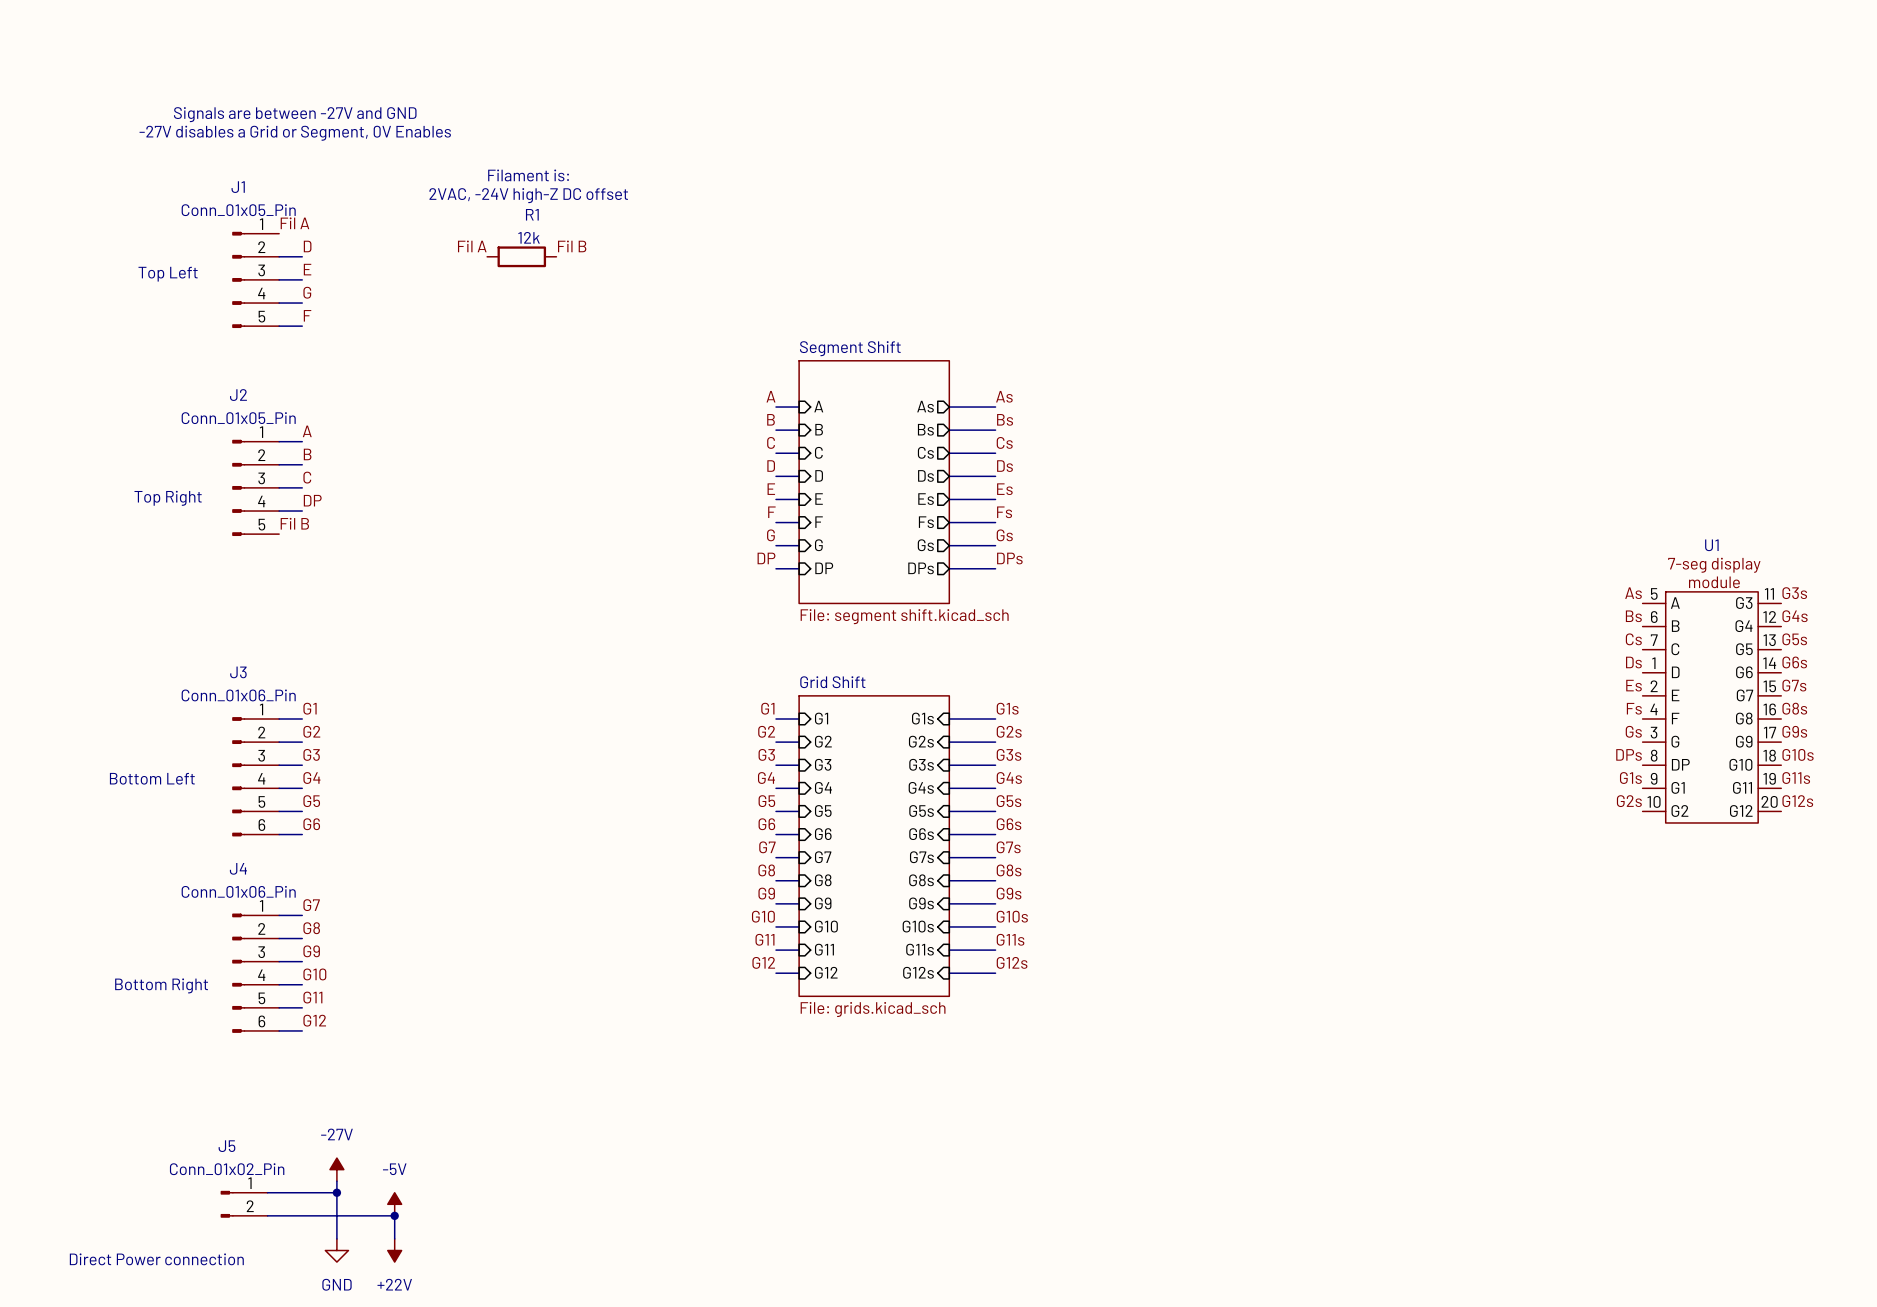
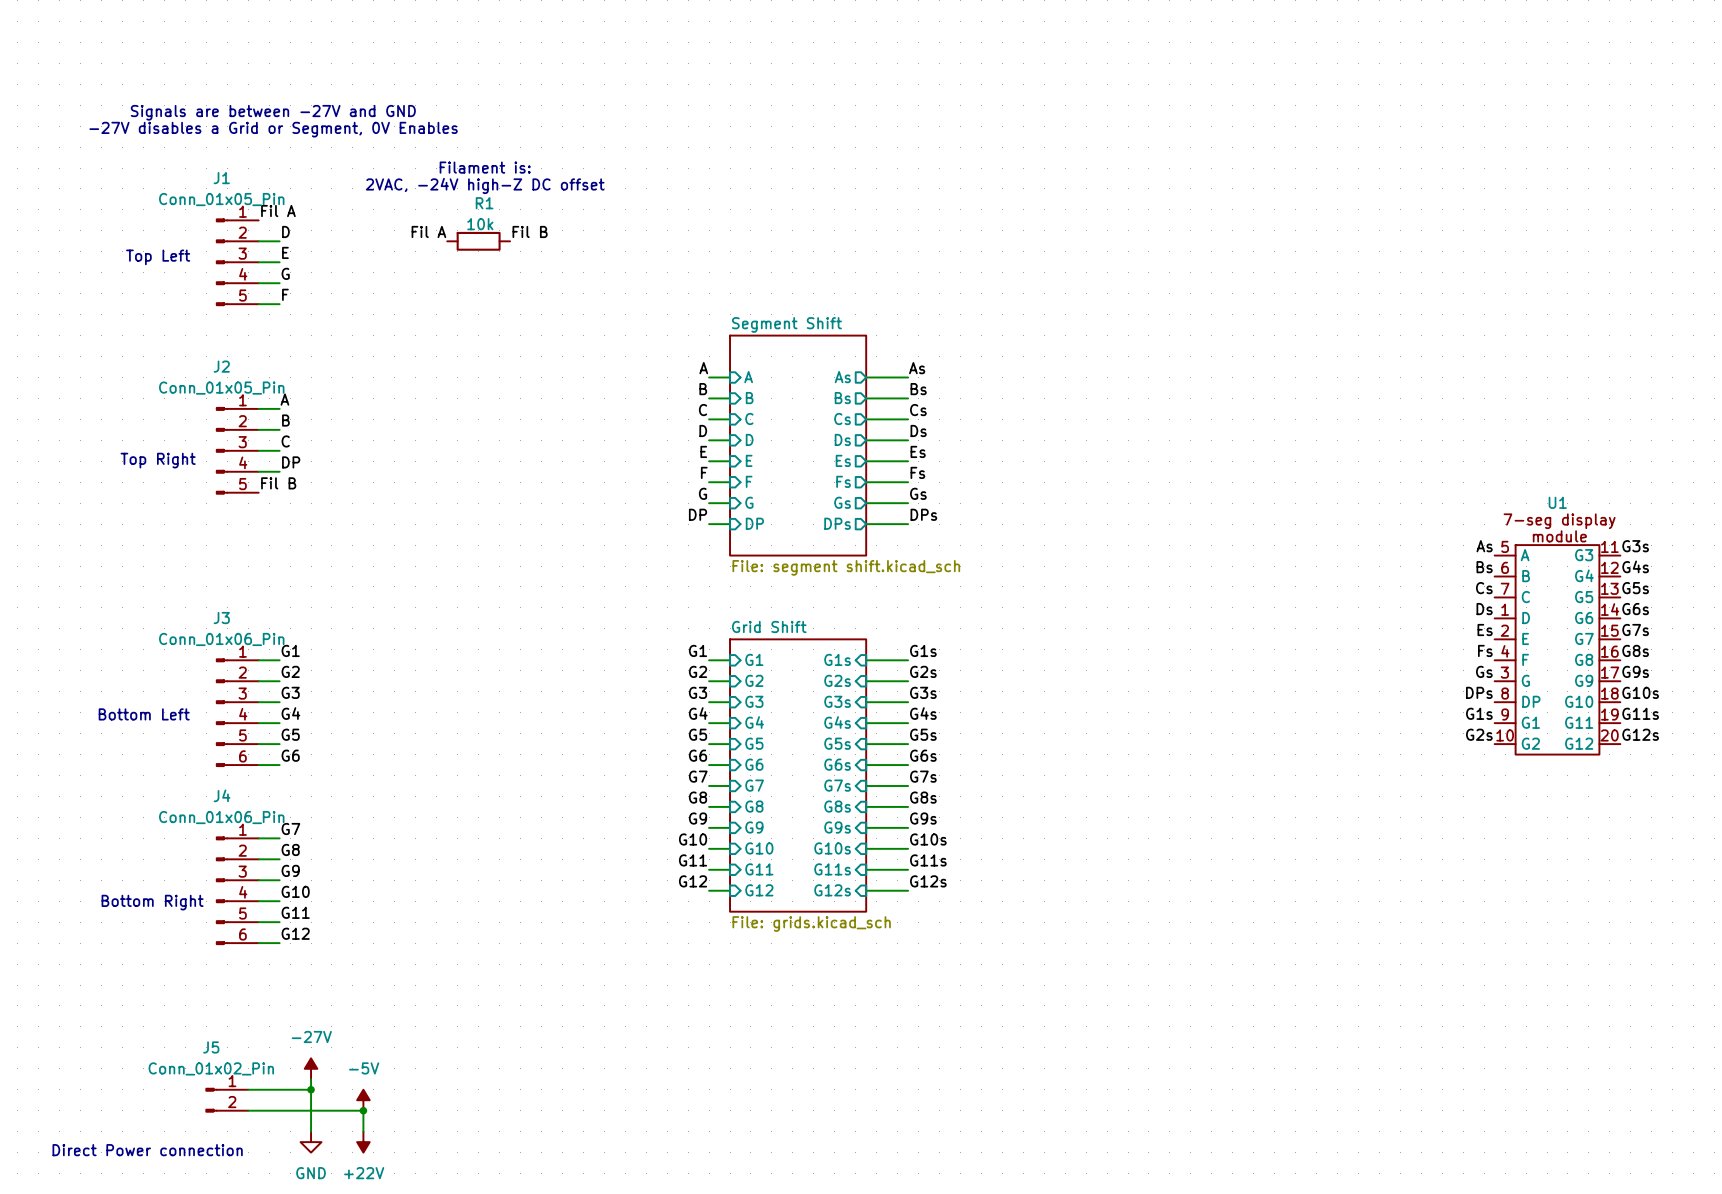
R1 value: 12k (529, 237) -> 10k (480, 224)

